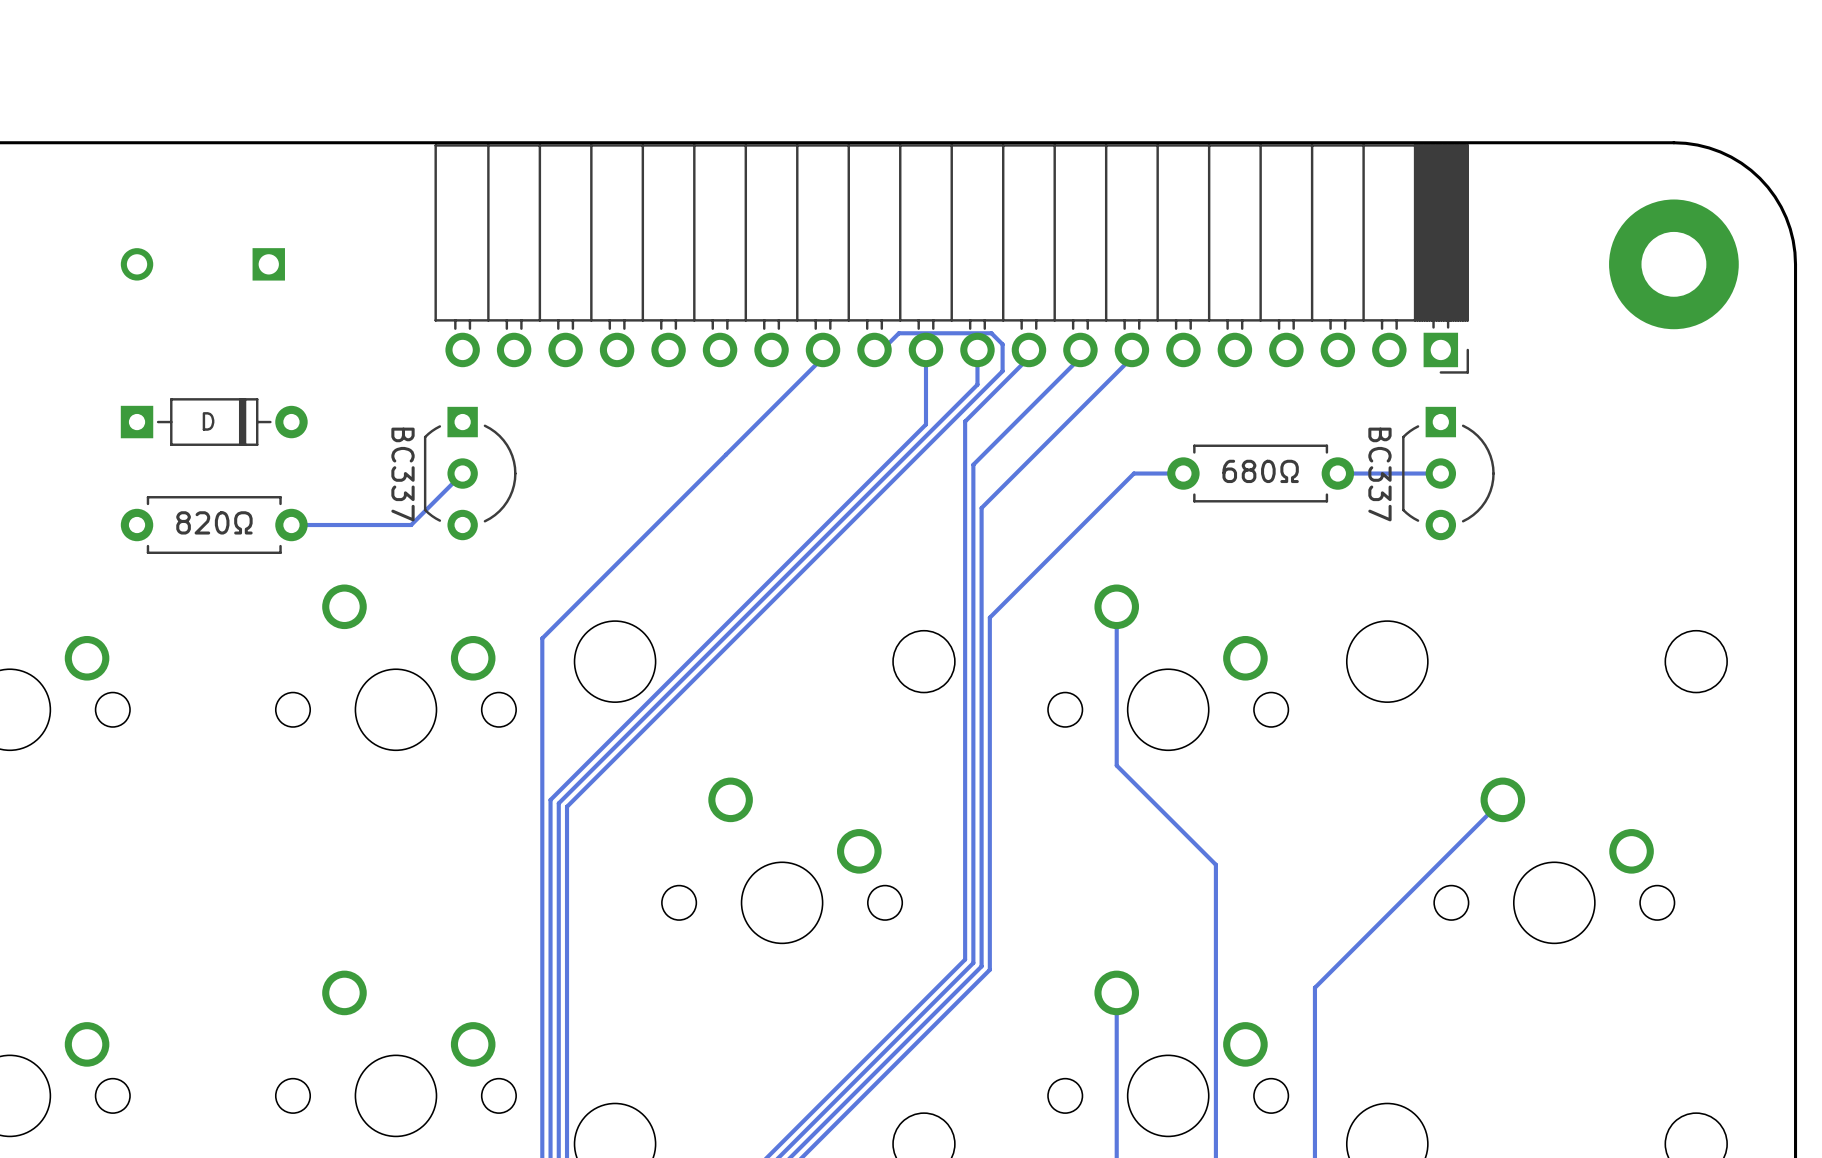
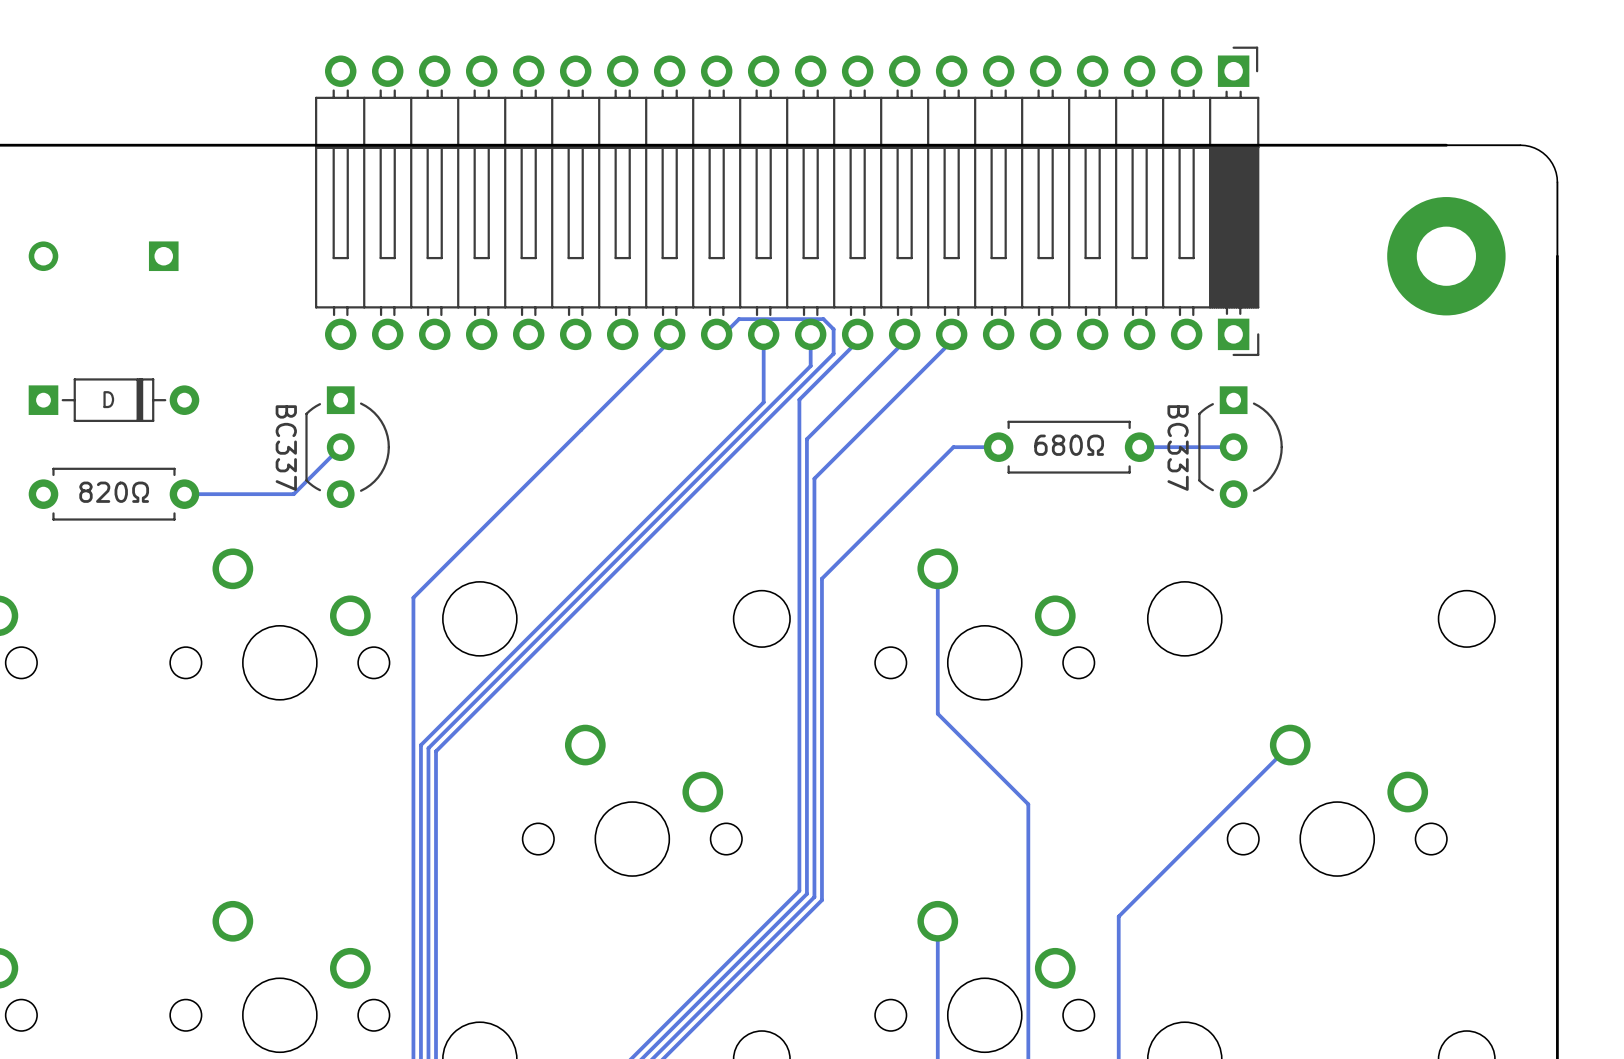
board edge: (1673, 142) (1697, 145) (1720, 151) (1741, 163) (1759, 178) (1775, 196) (1786, 217) (1793, 240) (1795, 264) -> (1446, 145) (1525, 145) (1538, 150) (1546, 156) (1552, 163) (1557, 177) (1557, 256)
part: none -> (787, 152)

